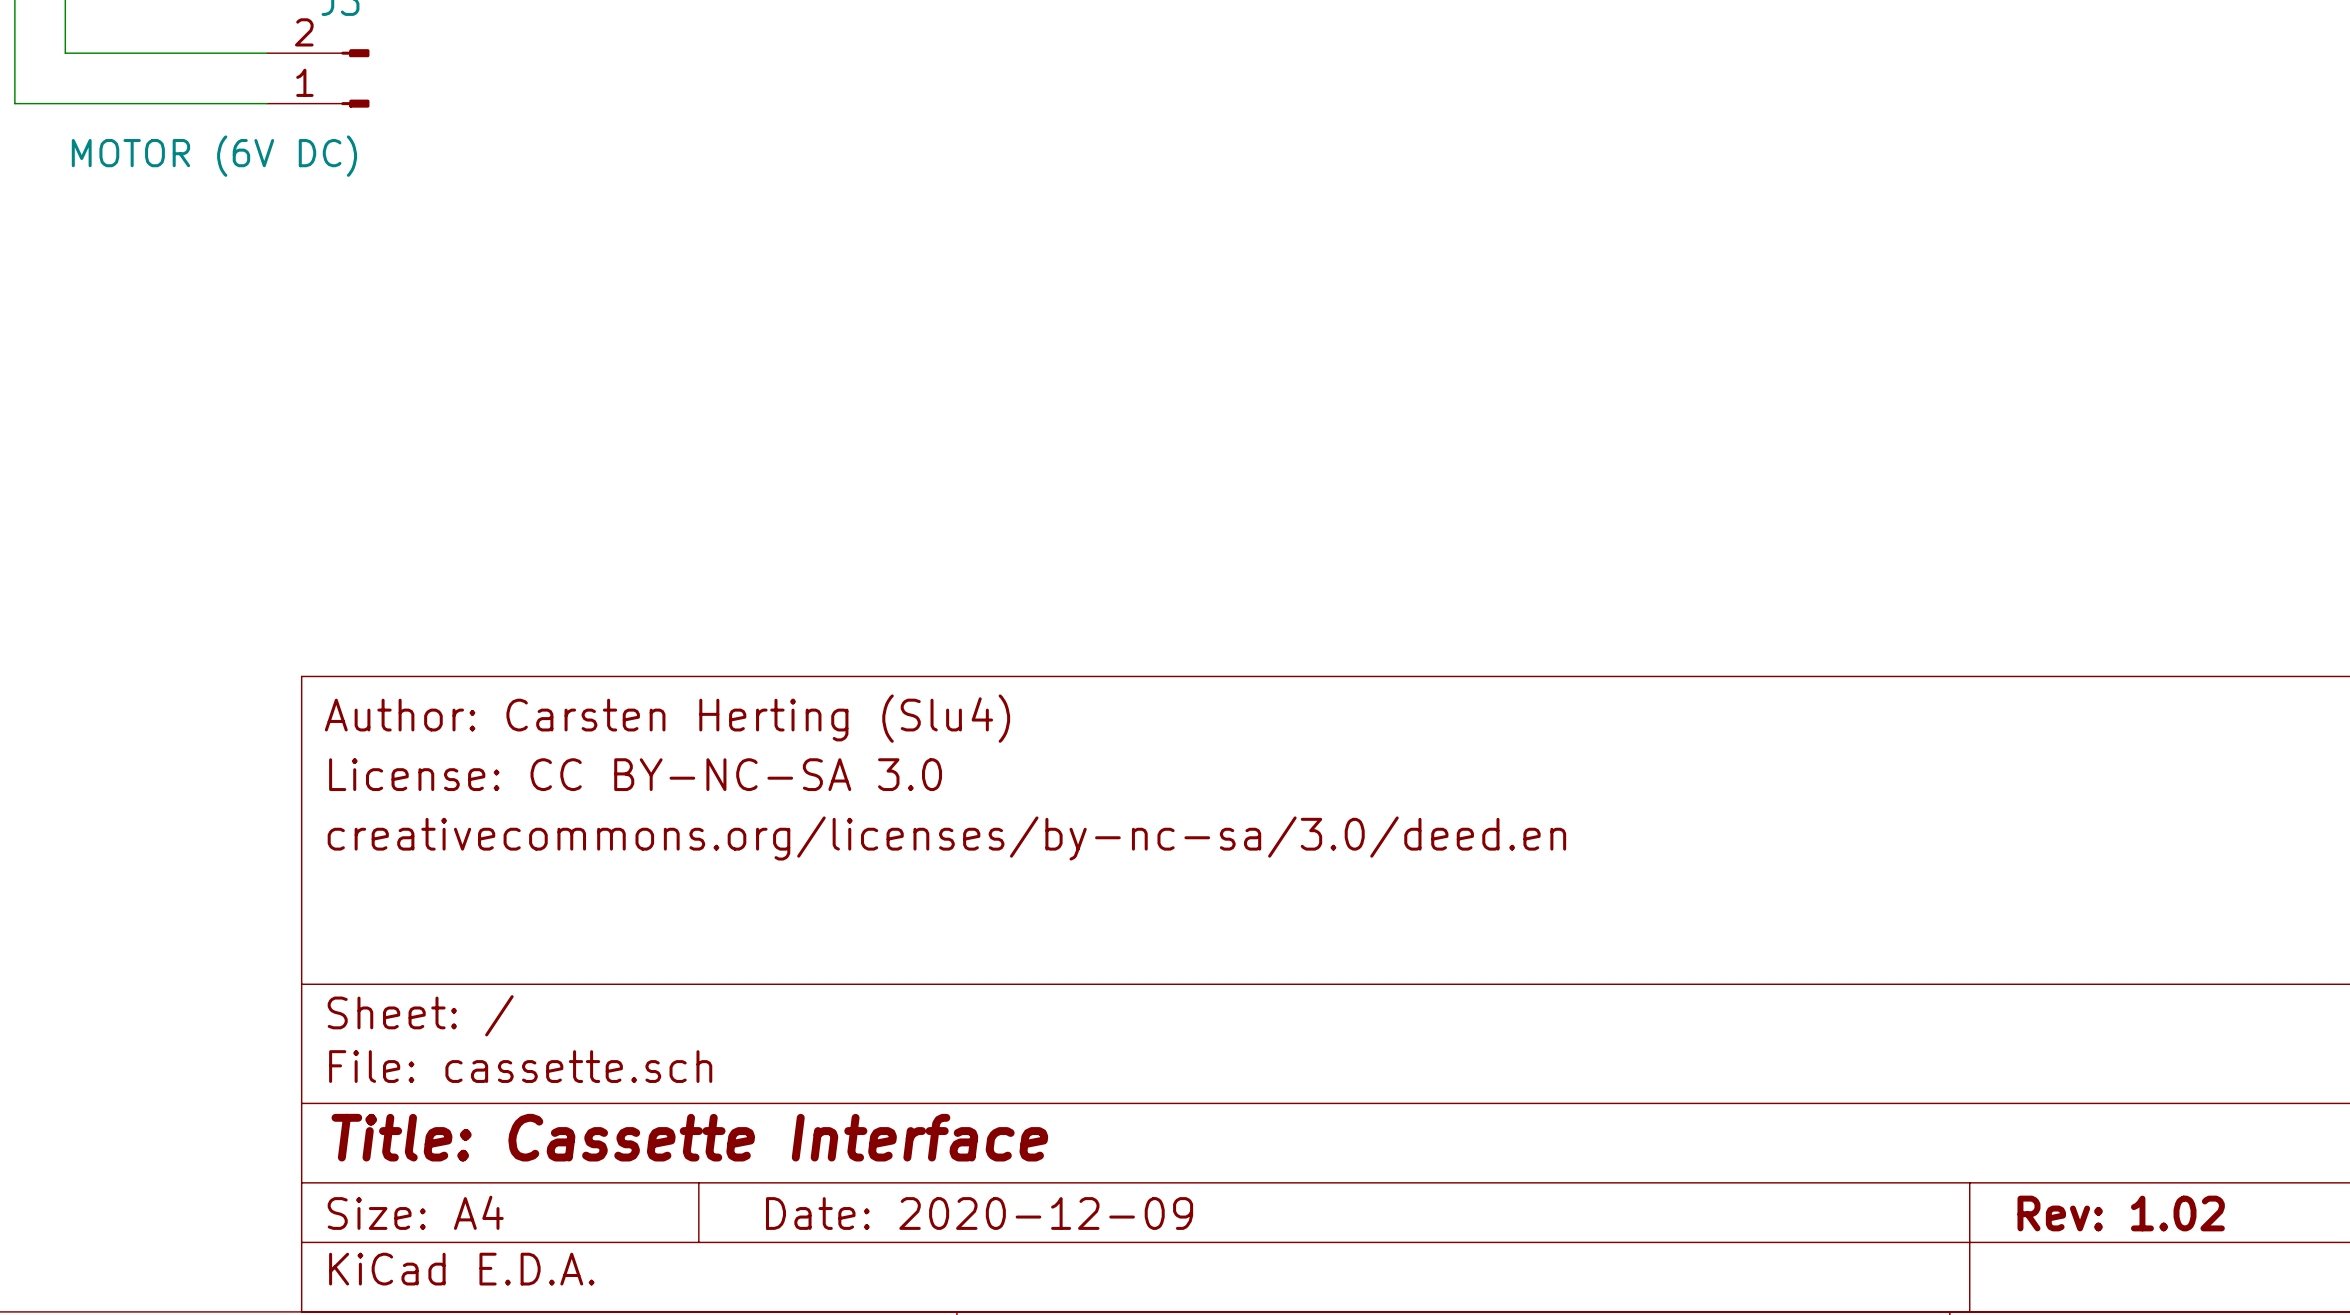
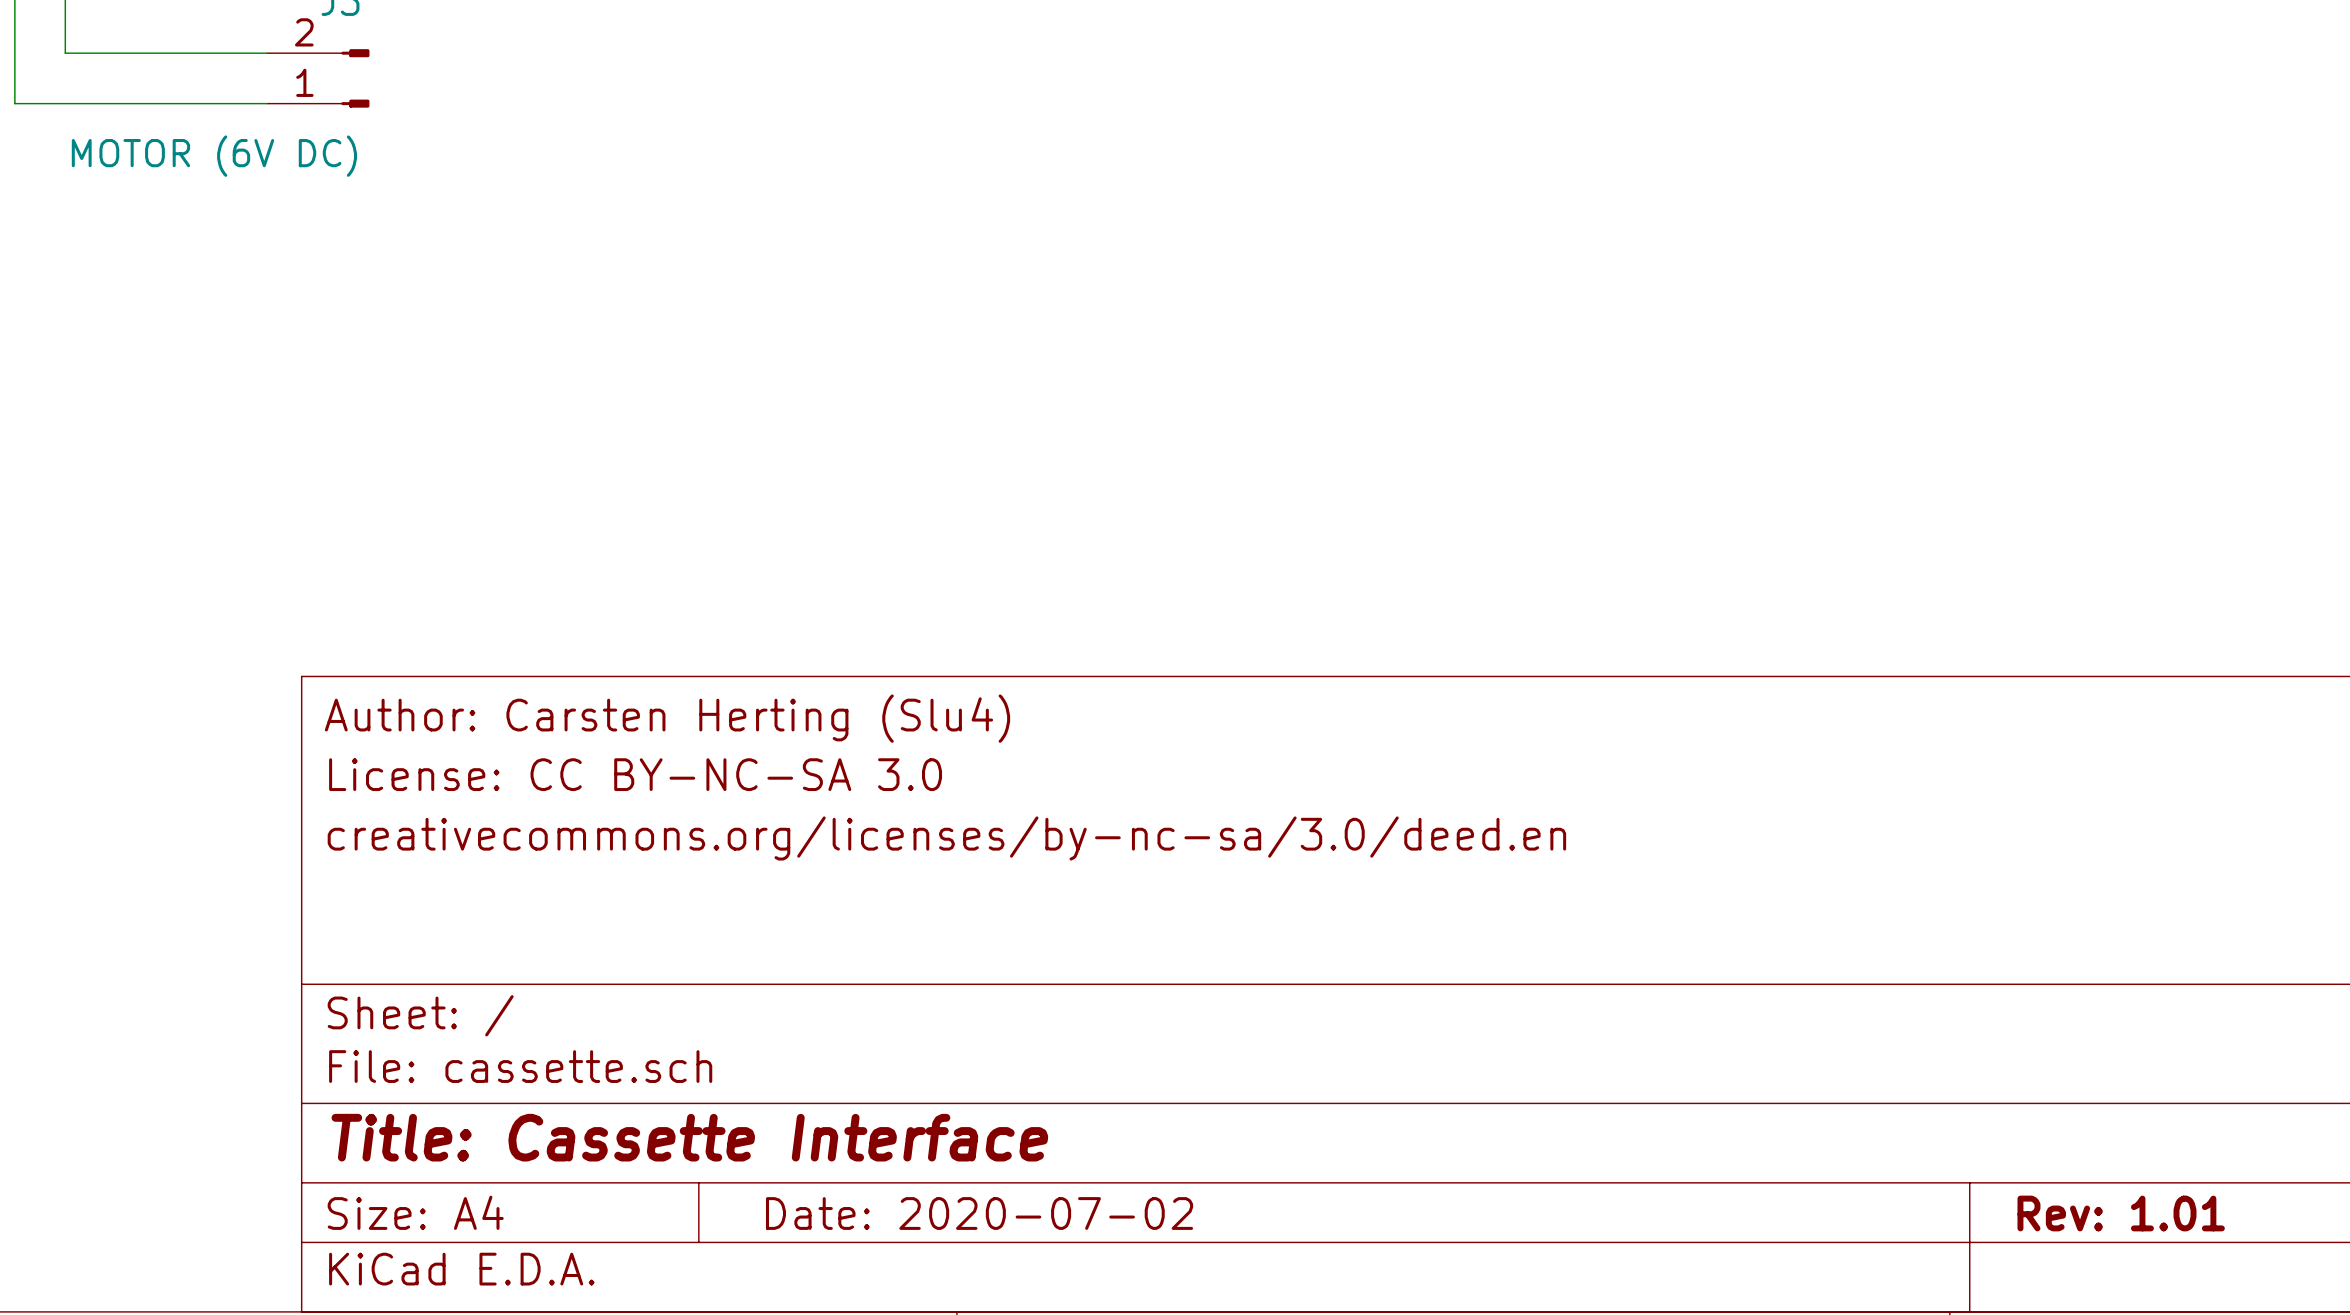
title block: Date: 2020-12-09 (979, 1213) -> Date: 2020-07-02 (979, 1213)
title block: Rev: 1.02 (2121, 1213) -> Rev: 1.01 (2121, 1213)

